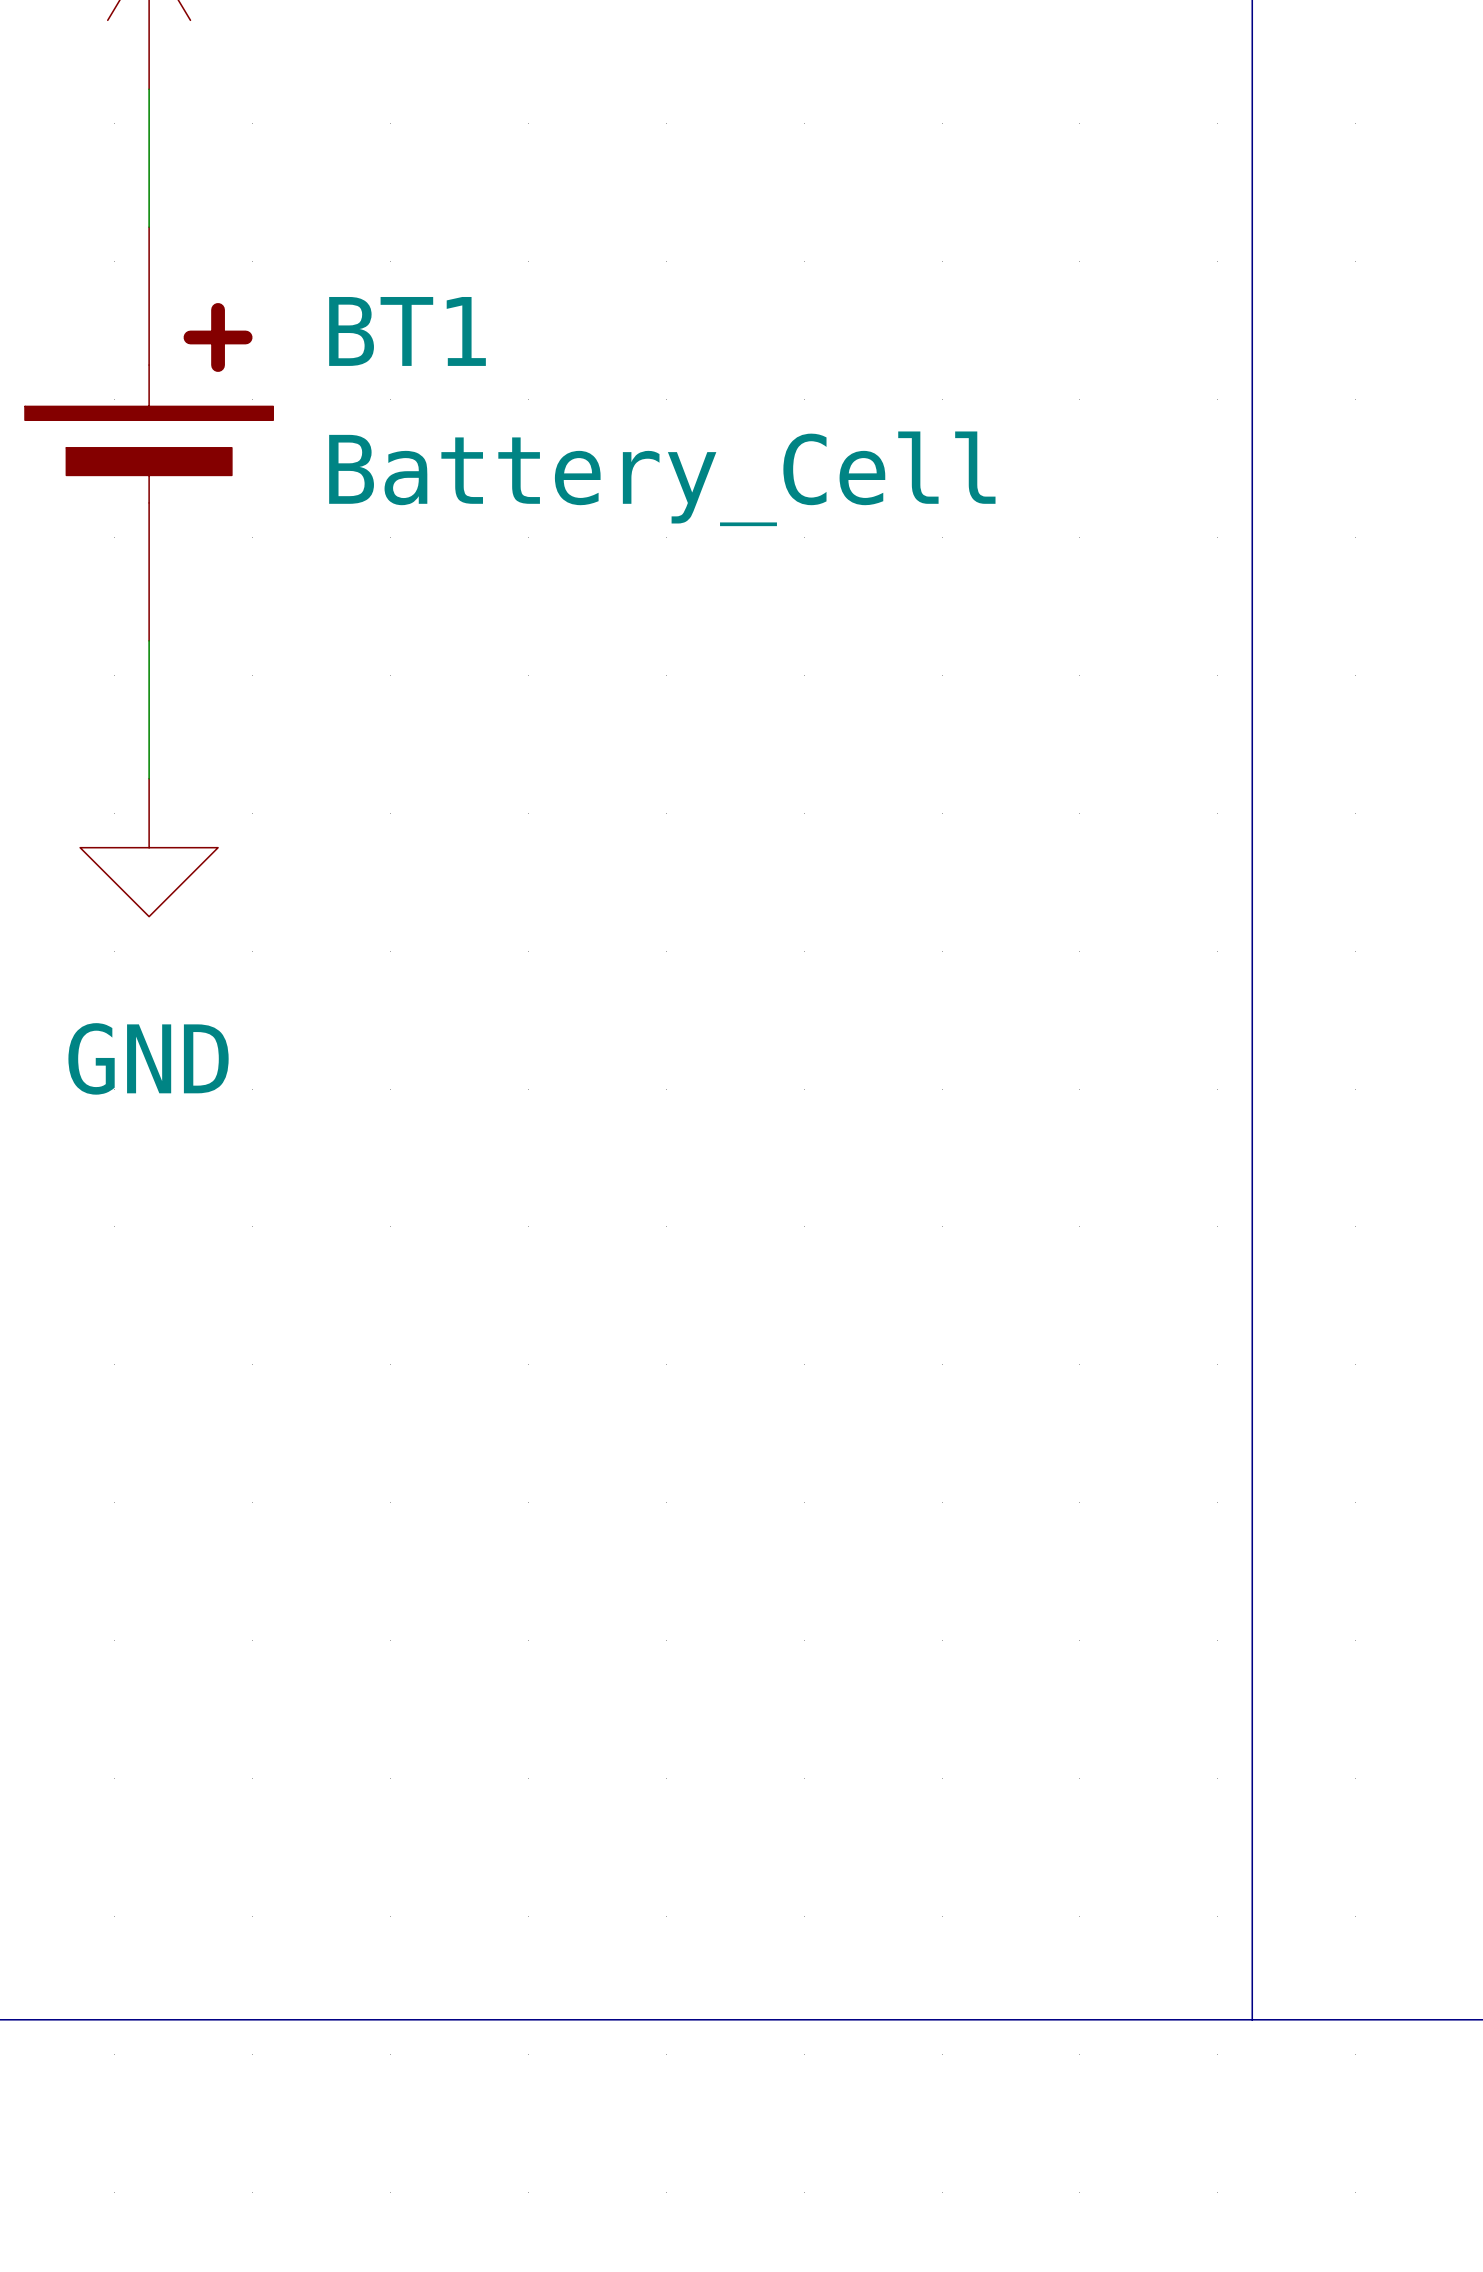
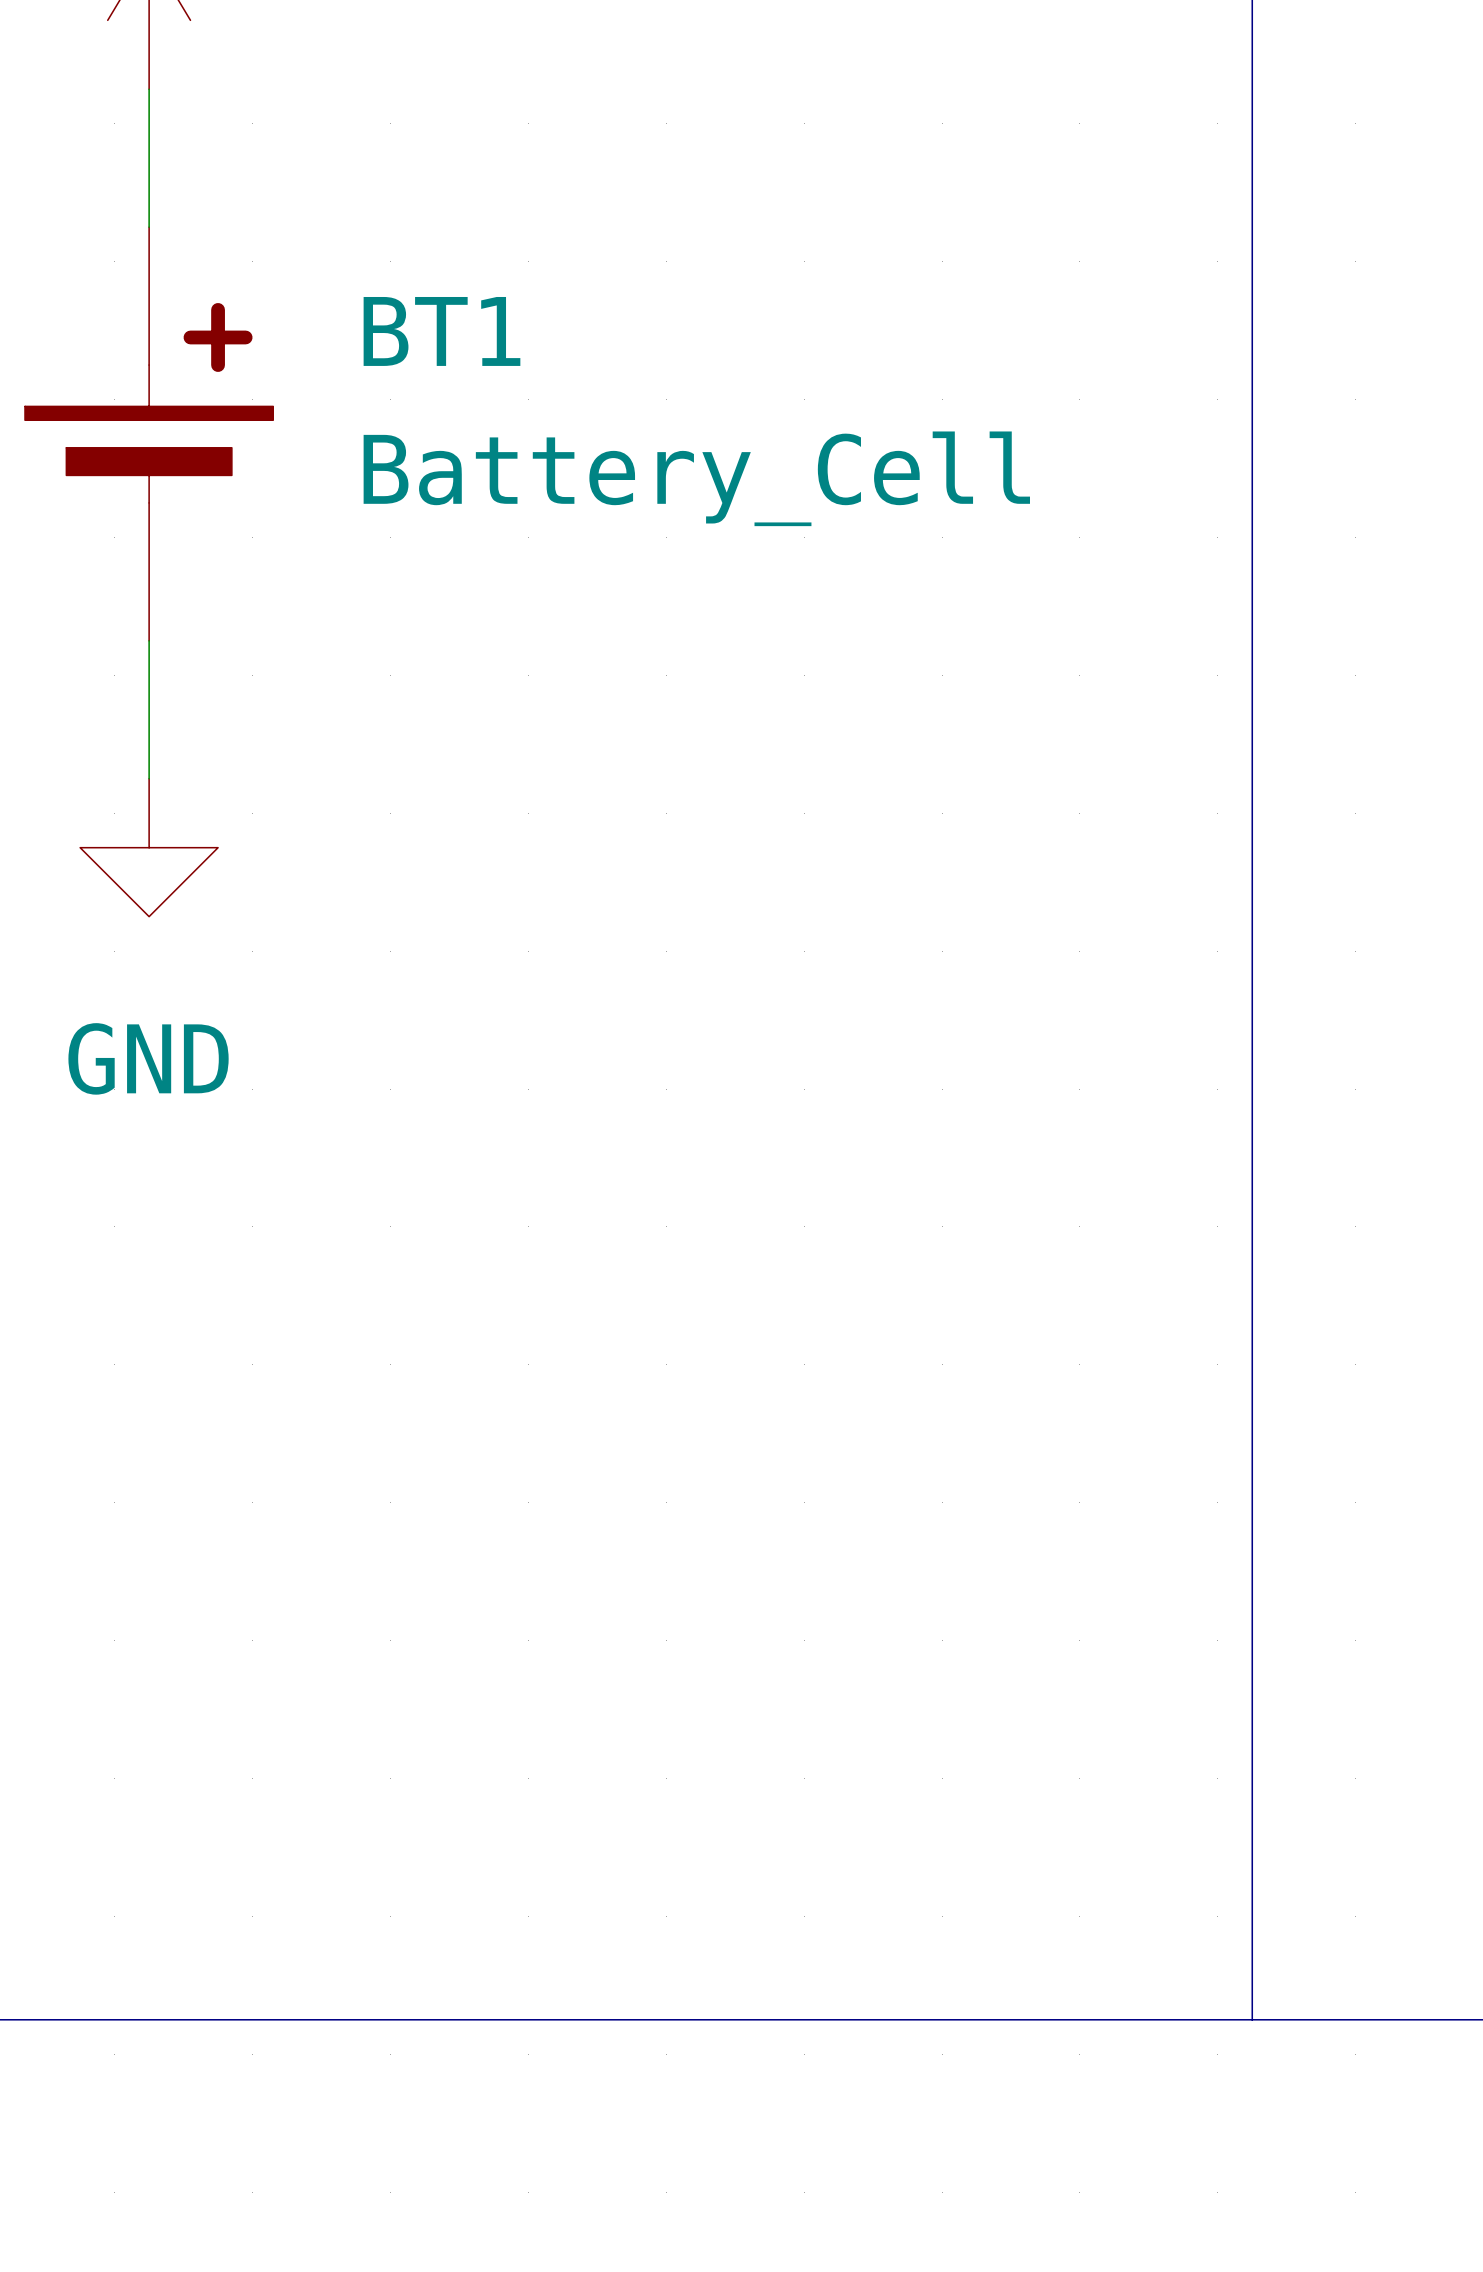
BT1 name position: BT1 (407, 331) -> BT1 (441, 331)
BT1 value position: Battery_Cell (662, 478) -> Battery_Cell (696, 478)

